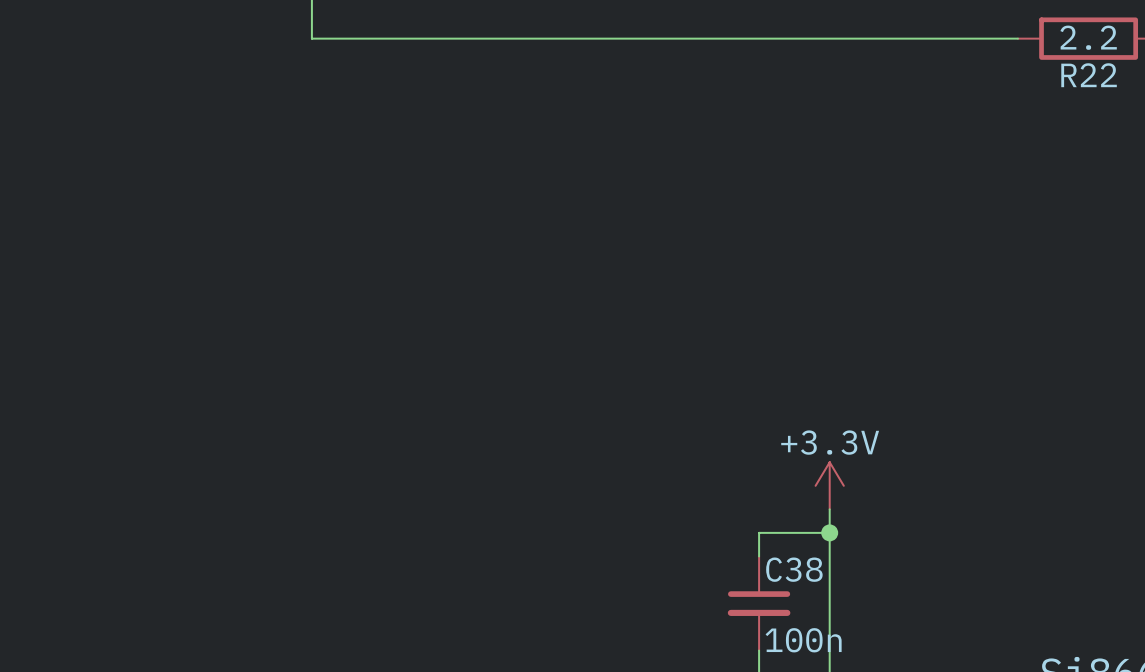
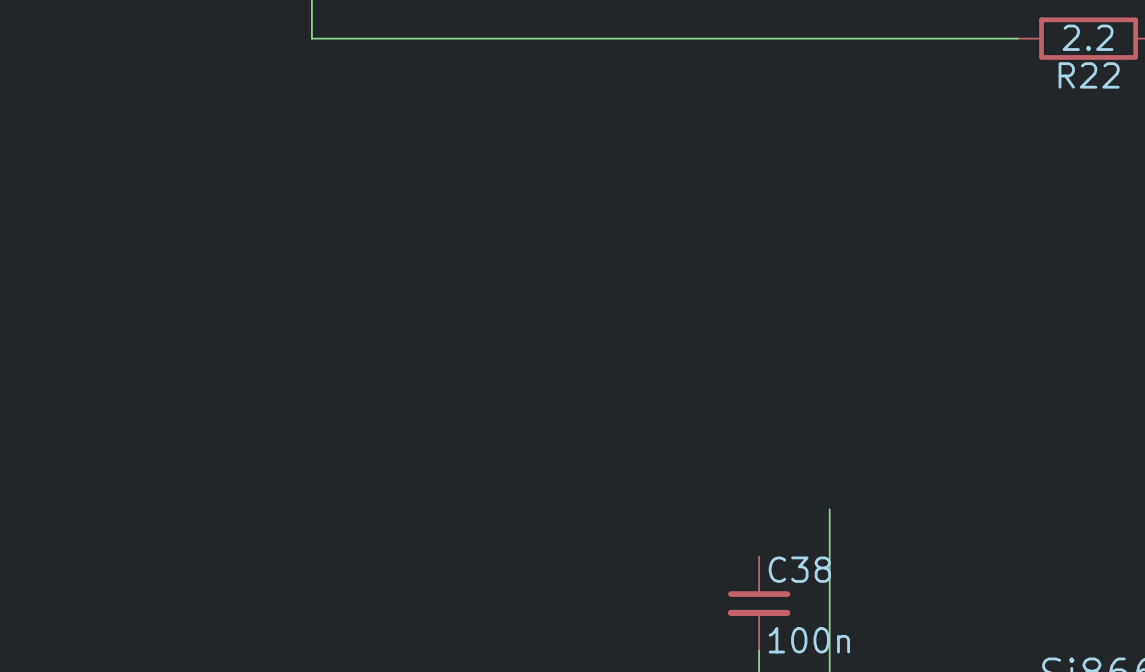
power symbol: +3.3V (829, 485) -> none
wire: (829, 532) (759, 532) (759, 556) -> none
junction: (829, 532) -> none

